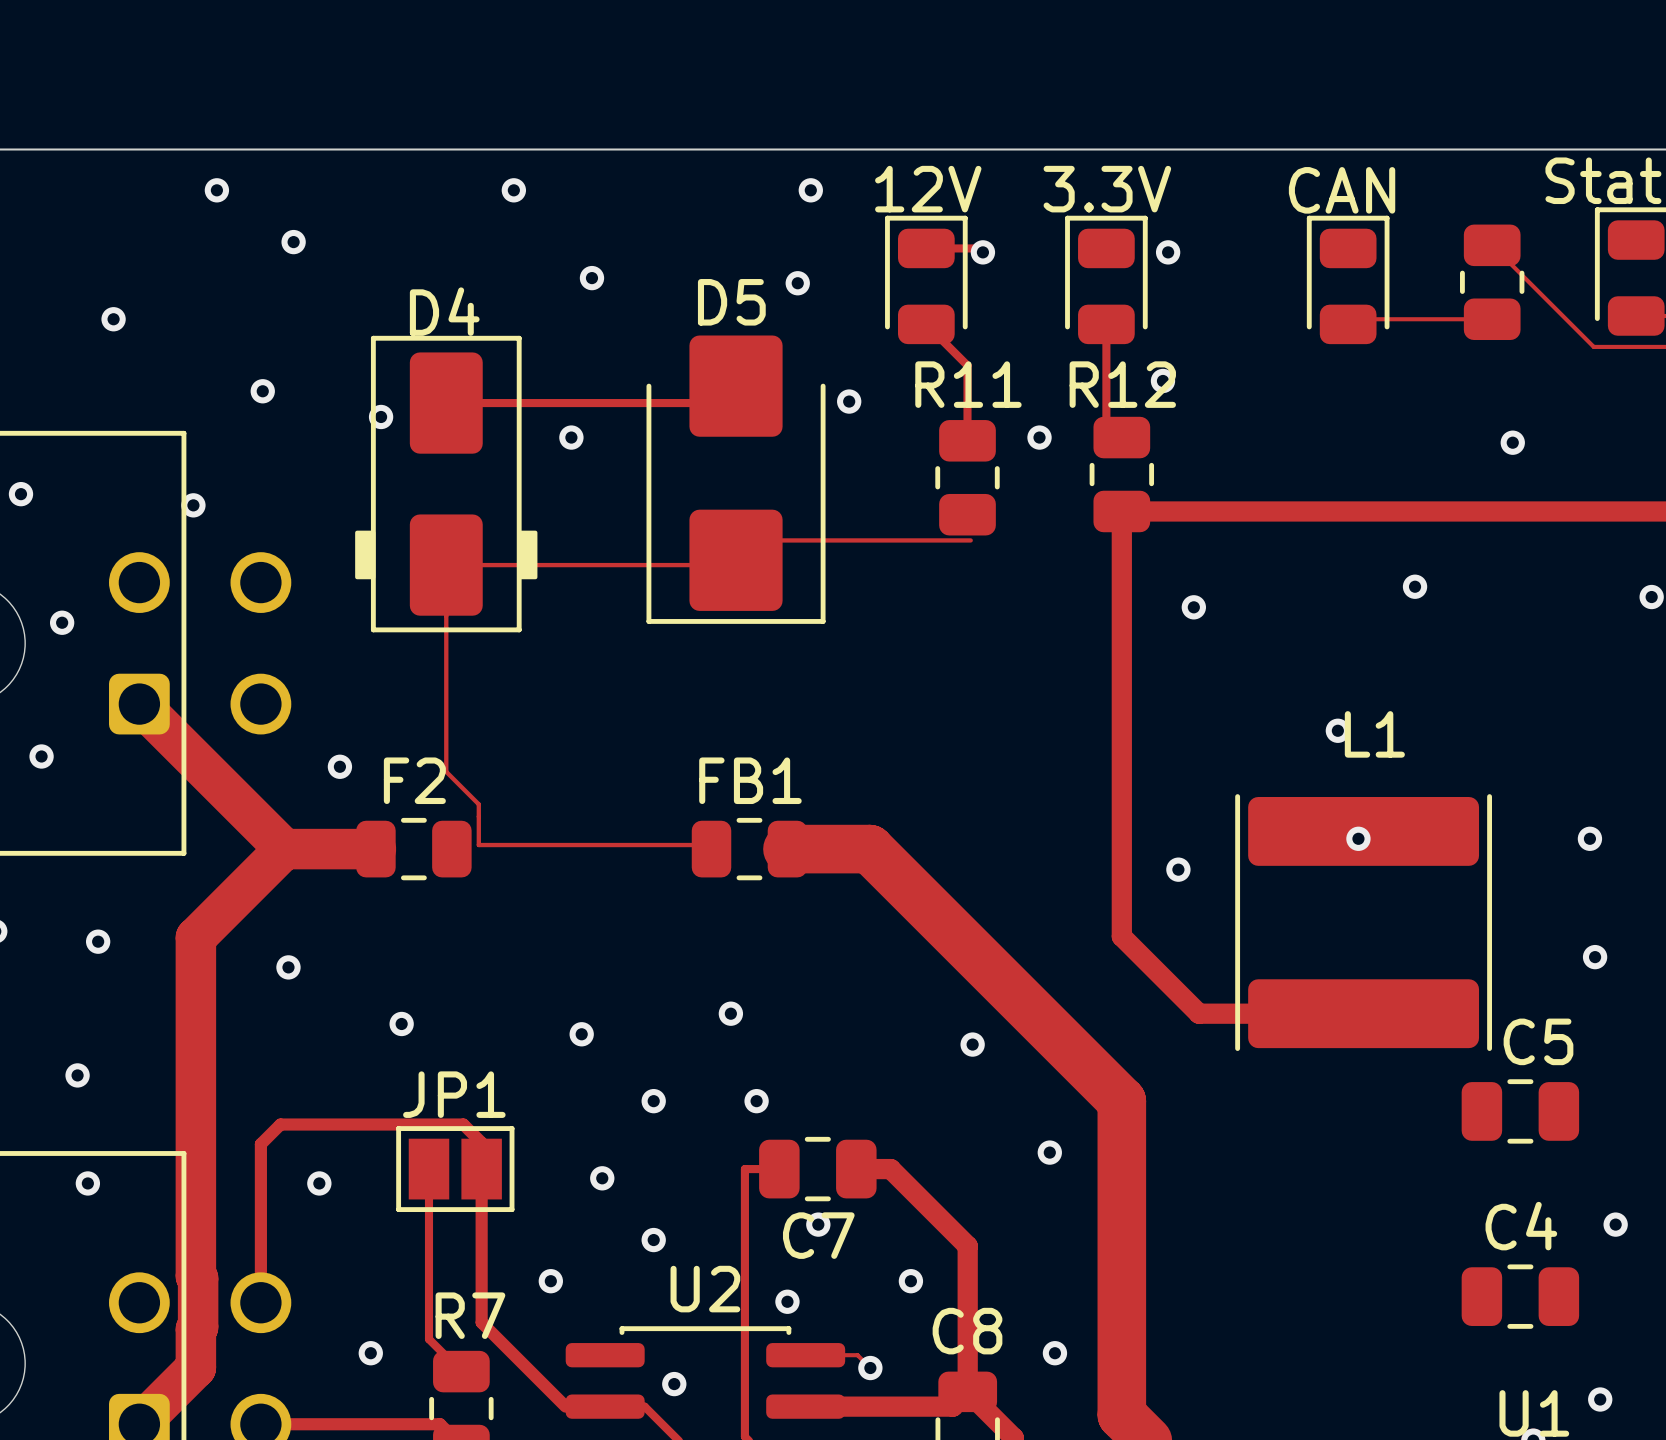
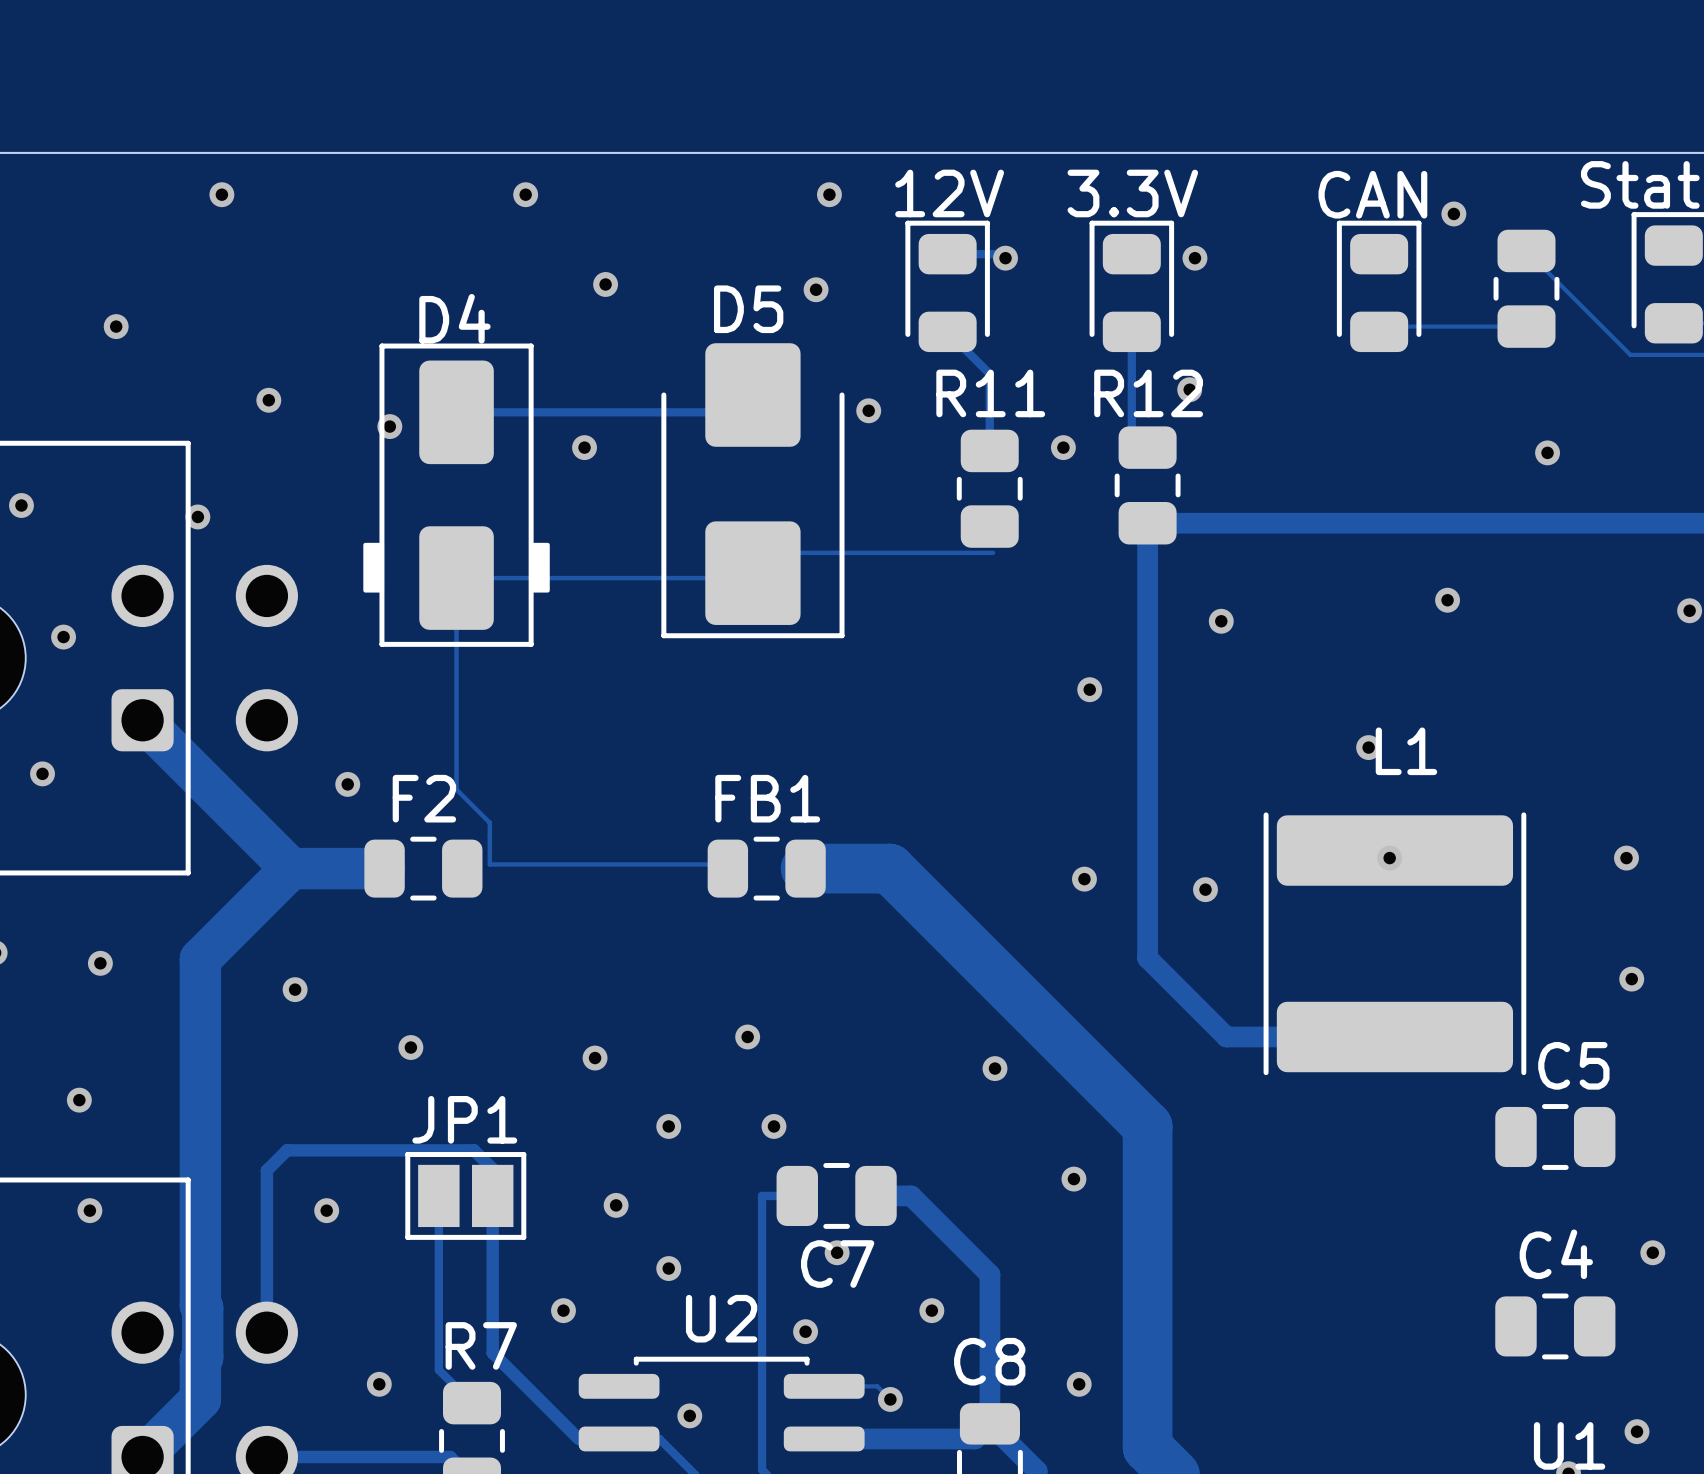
via: none -> (1453, 213)
via: (293, 242) -> none
via: none -> (1089, 689)
via: none -> (1084, 879)

